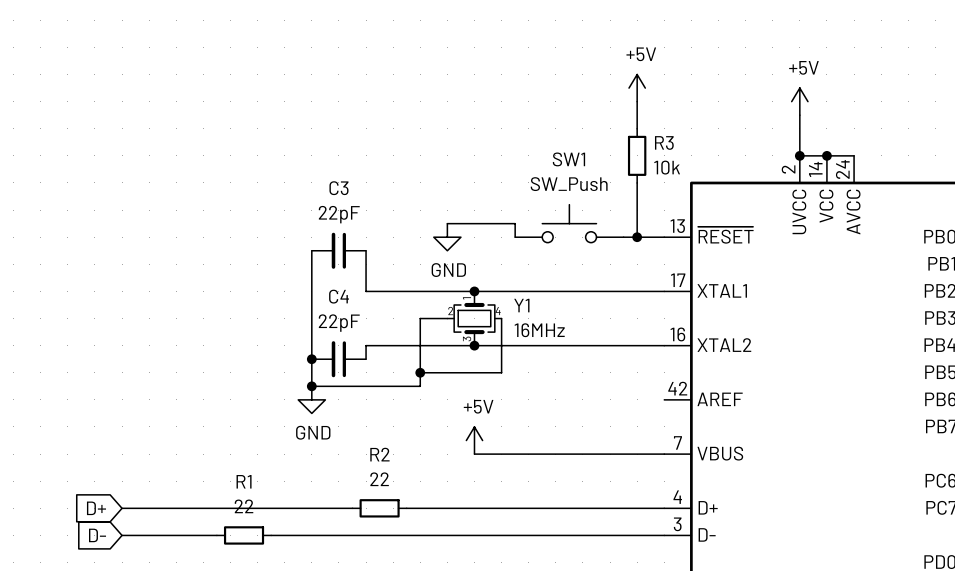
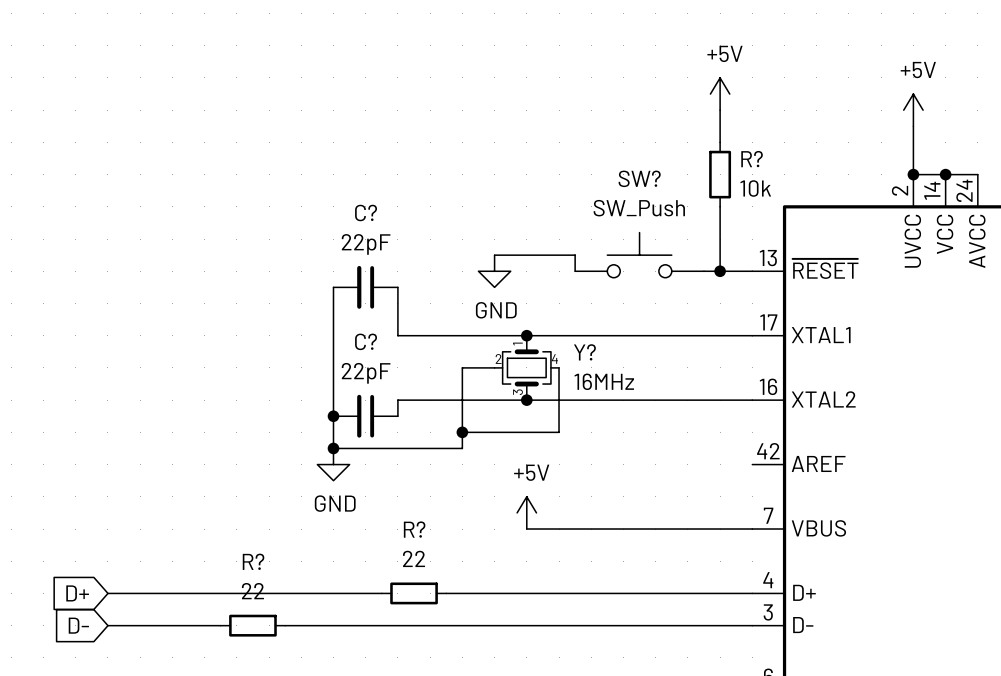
R3 name: R3 (664, 142) -> R? (752, 159)
SW1 name: SW1 (568, 159) -> SW? (639, 178)
C3 name: C3 (338, 188) -> C? (366, 212)
C4 name: C4 (339, 296) -> C? (366, 341)
Y1 name: Y1 (521, 305) -> Y? (584, 352)
R2 name: R2 (379, 454) -> R? (414, 529)
R1 name: R1 (244, 481) -> R? (253, 561)

